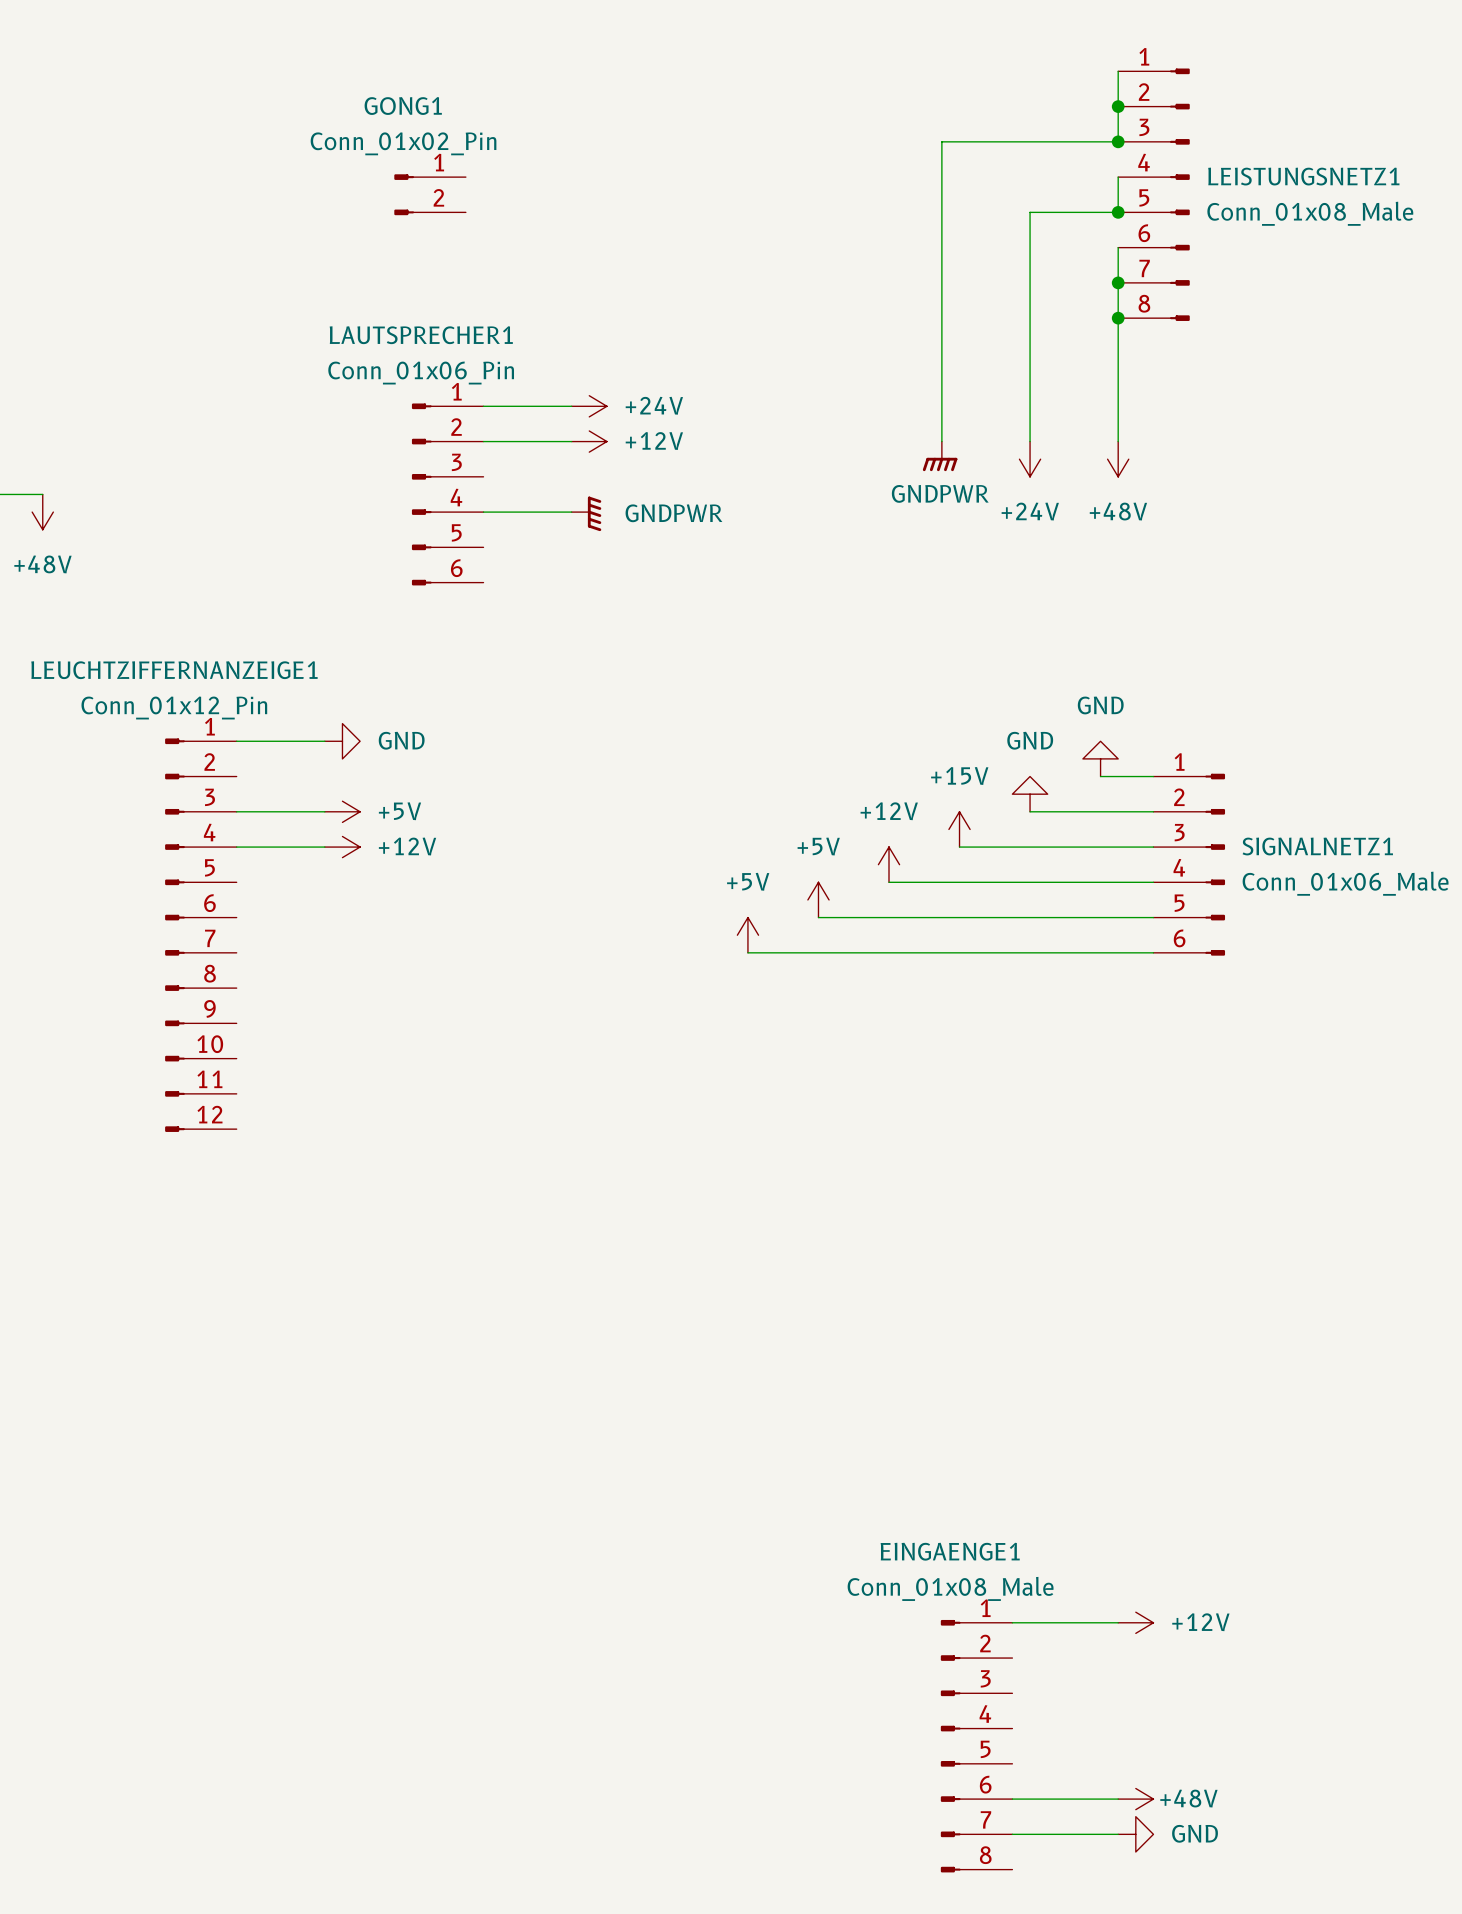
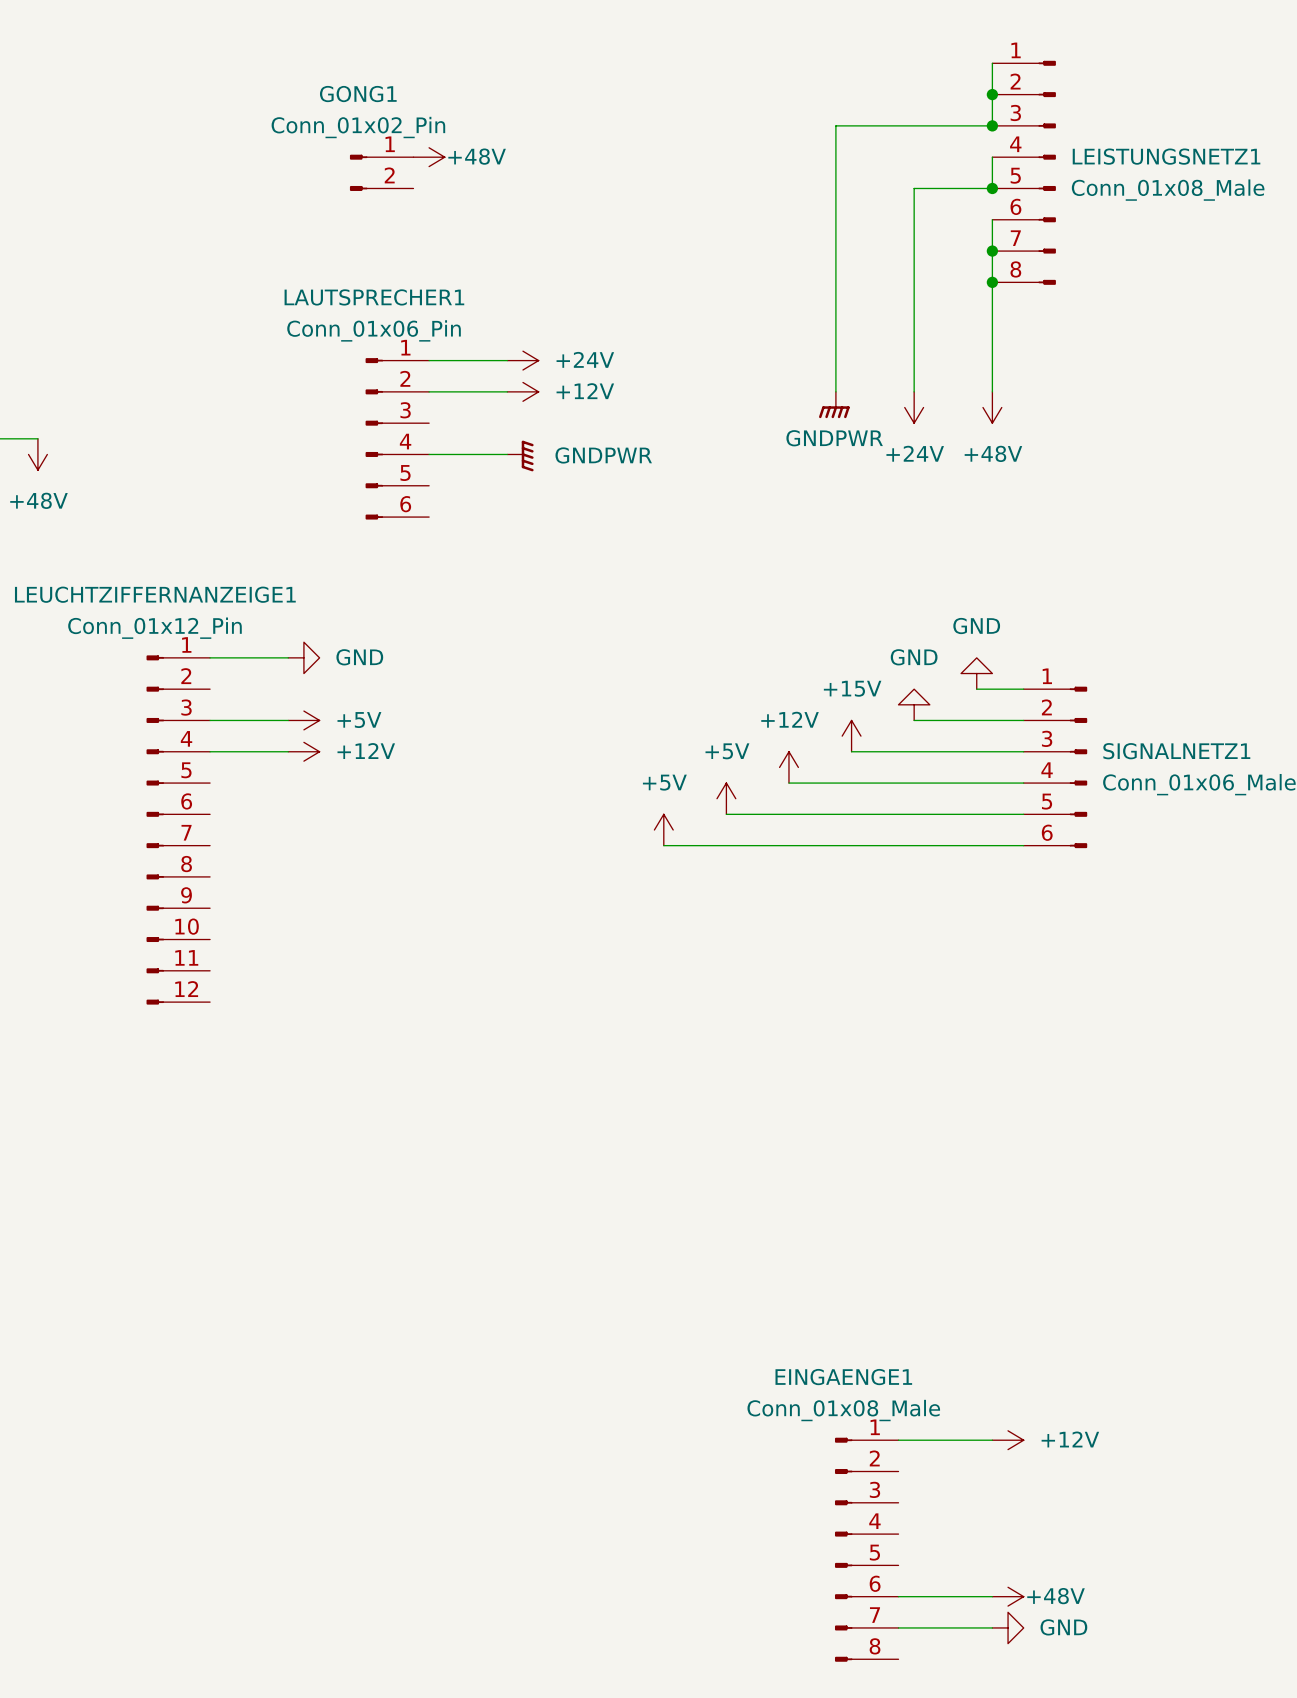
power symbol: none -> +48V (429, 157)

